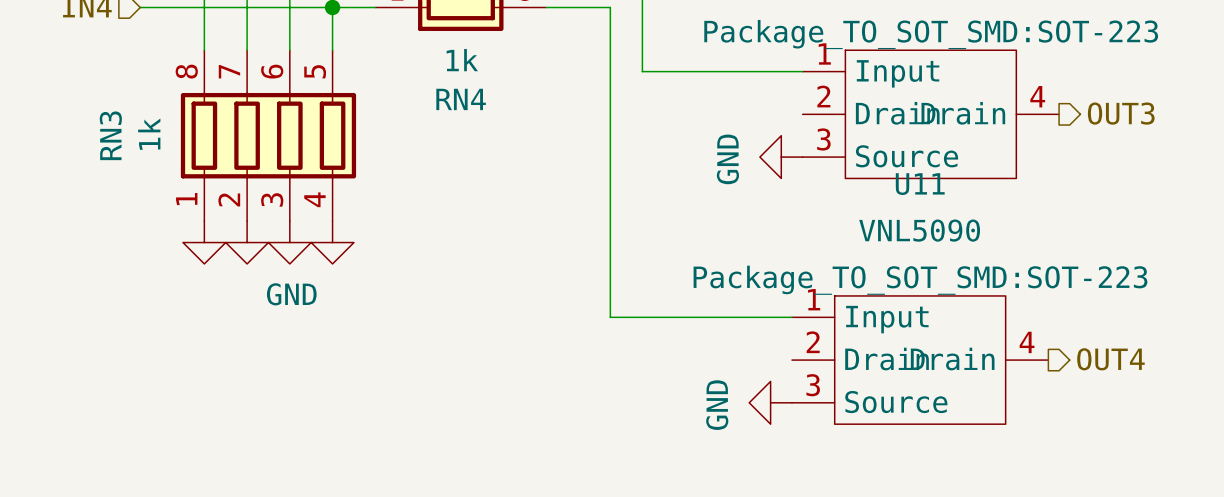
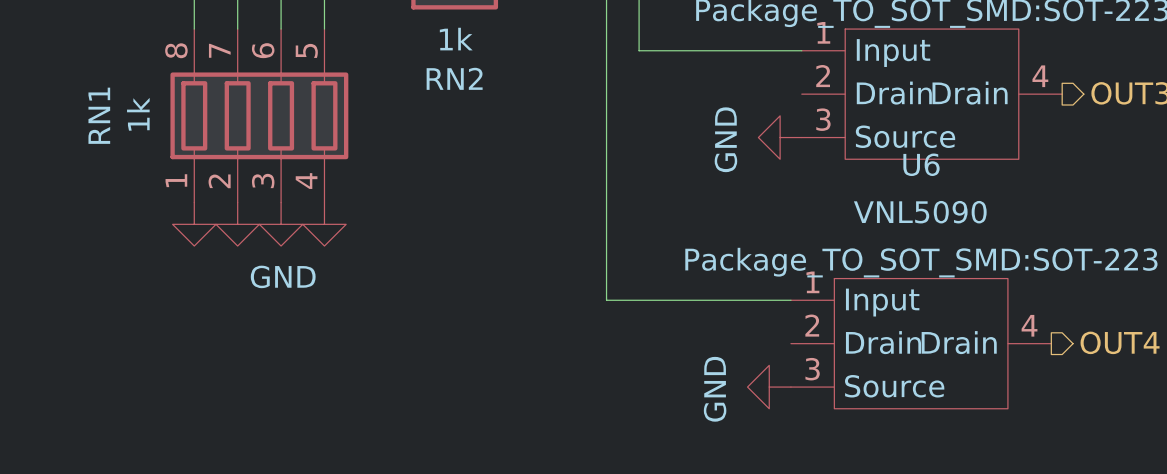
RN4 name: RN4 (461, 99) -> RN2 (454, 78)
RN3 name: RN3 (110, 135) -> RN1 (99, 115)
U11 name: U11 (920, 184) -> U6 (921, 164)

